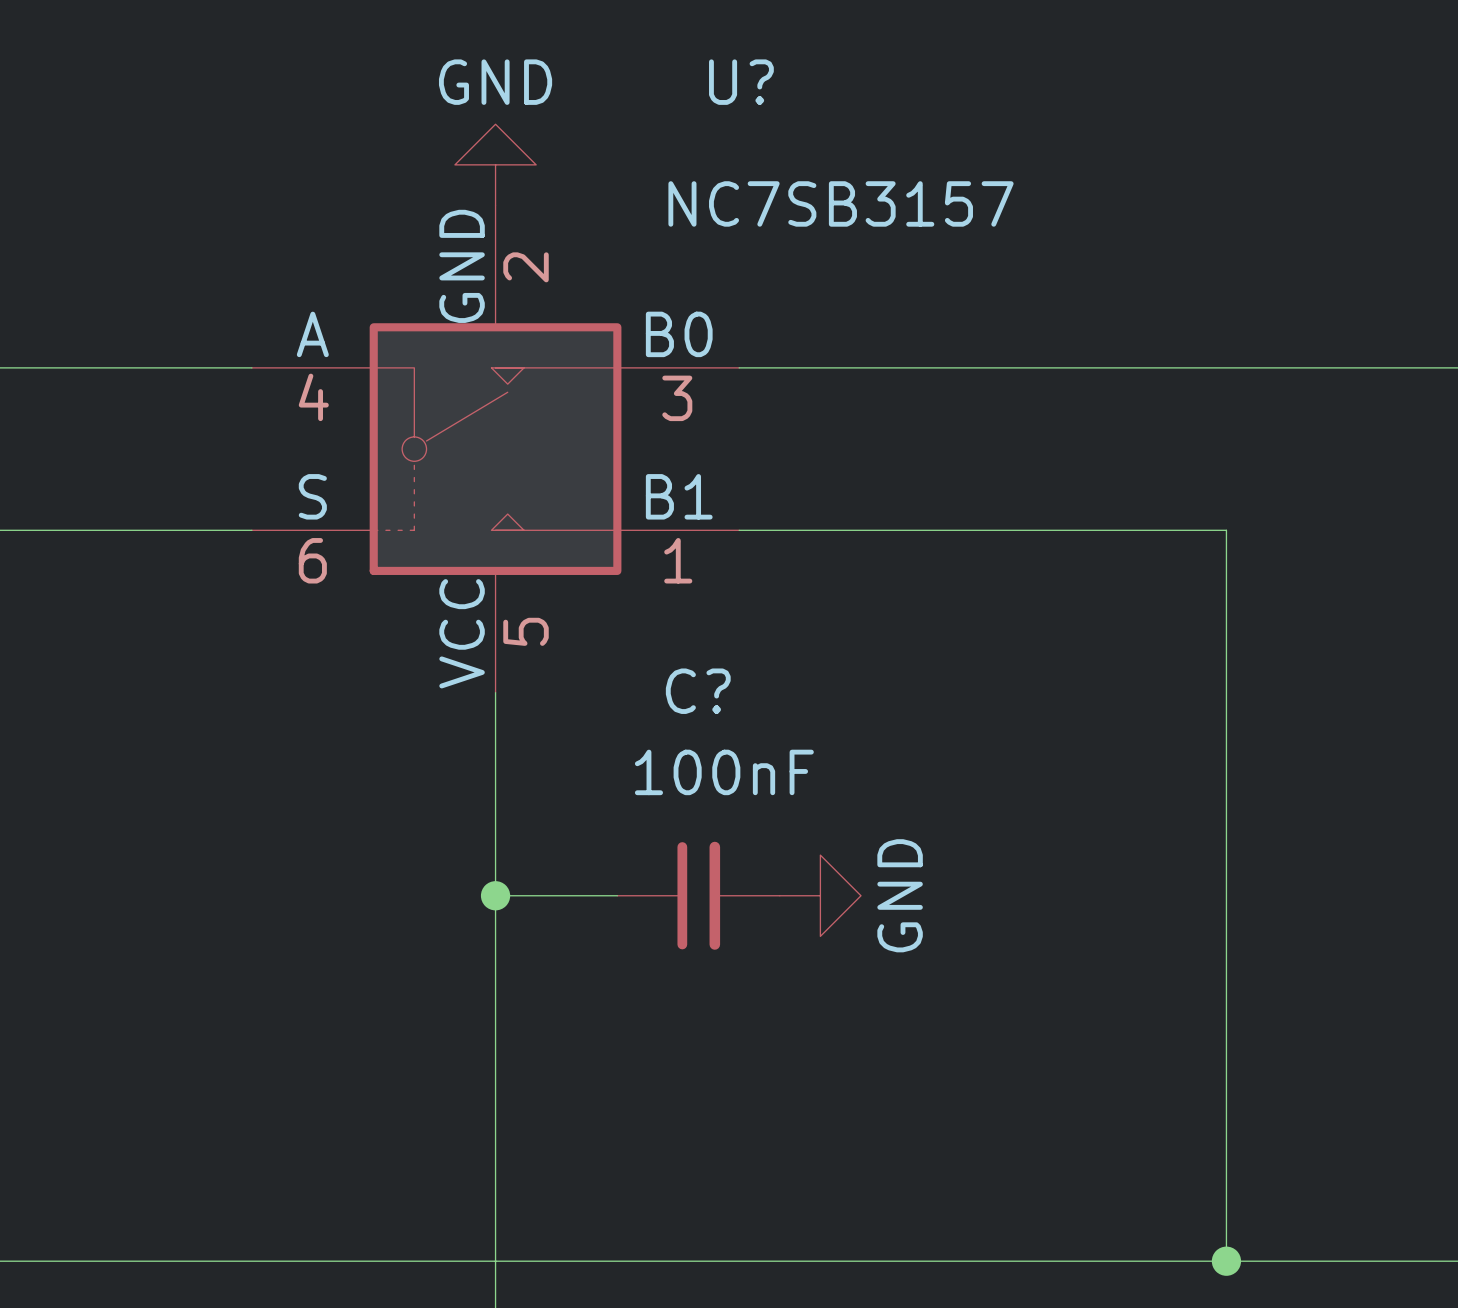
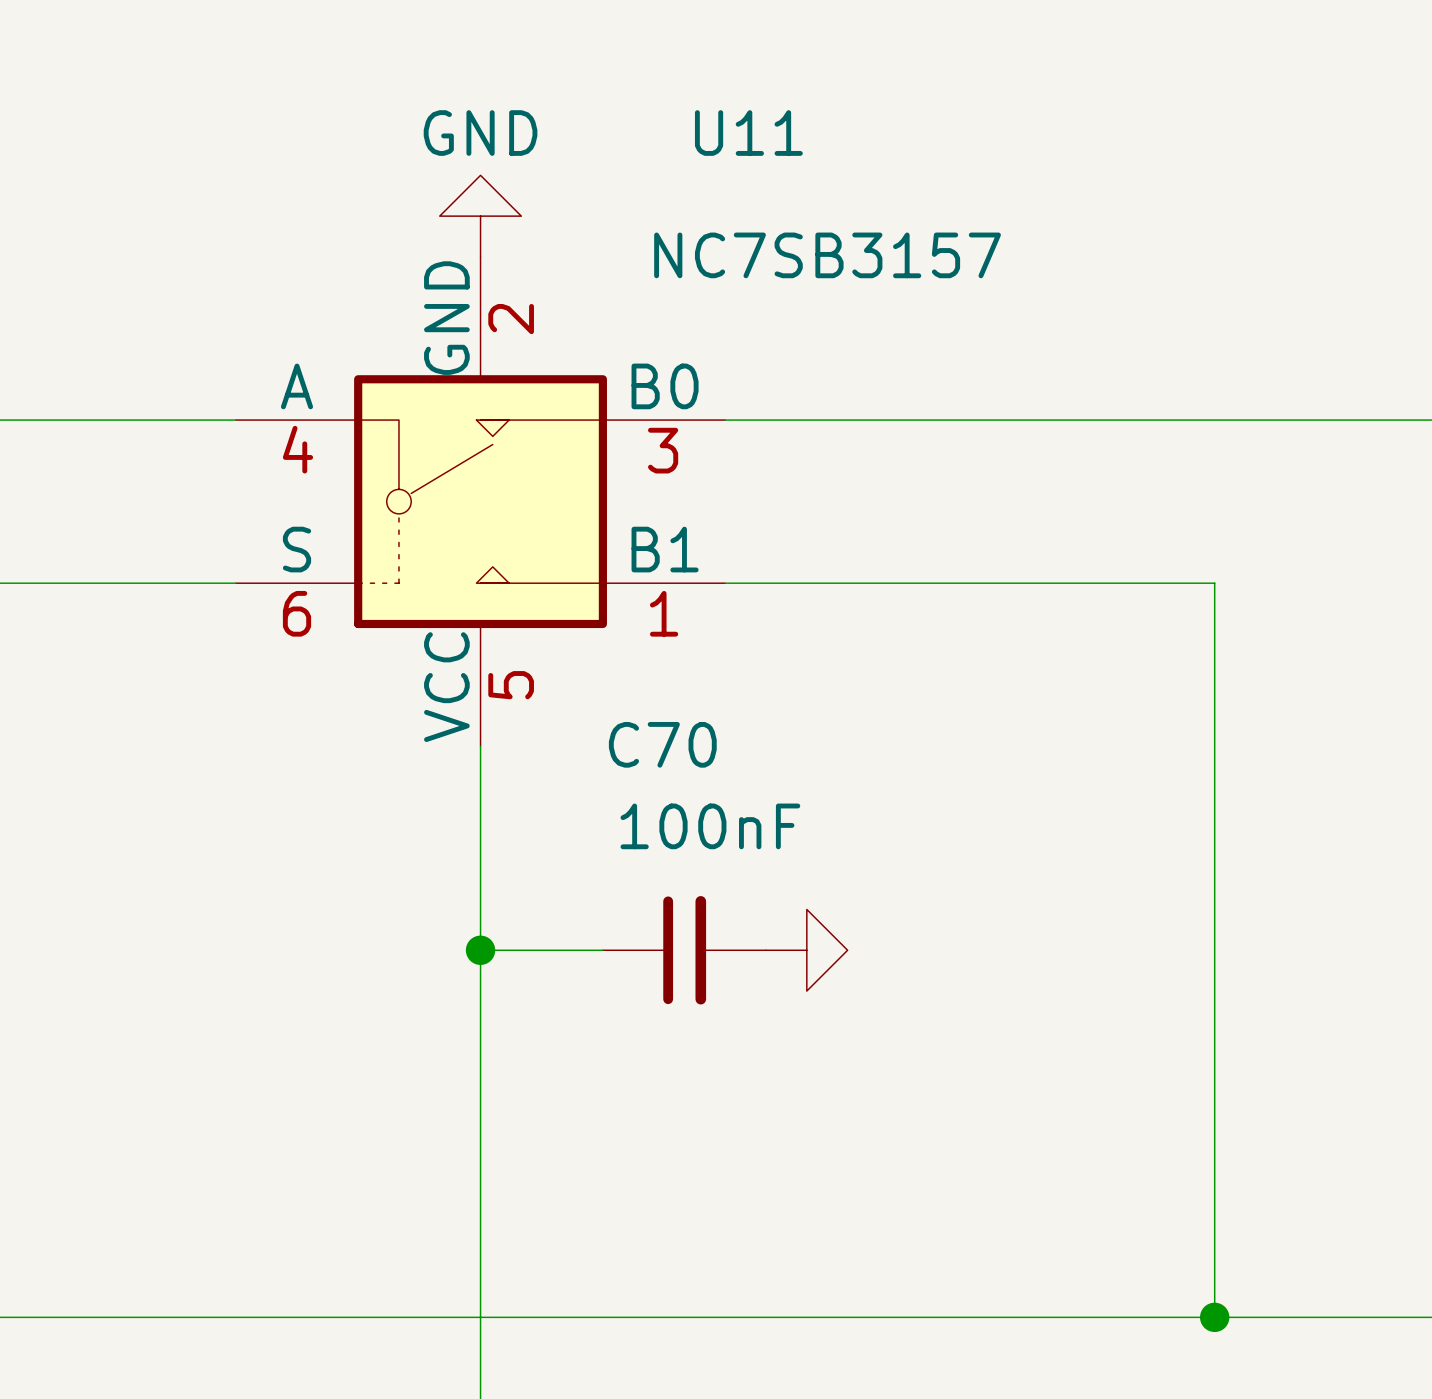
U? name: U? (741, 82) -> U11 (748, 133)
C? name: C? (698, 691) -> C70 (662, 744)
power symbol text: GND (900, 895) -> none

